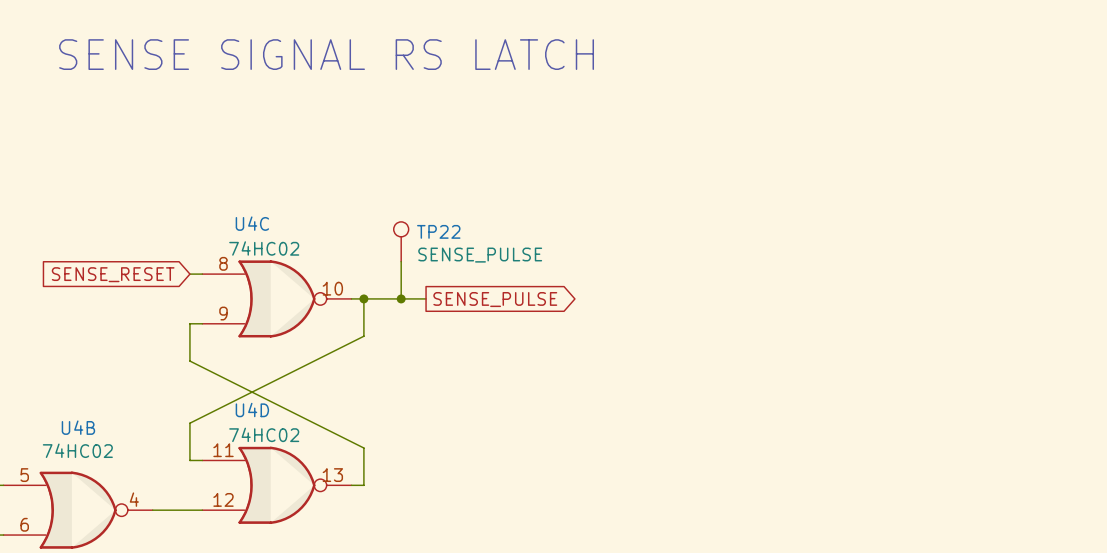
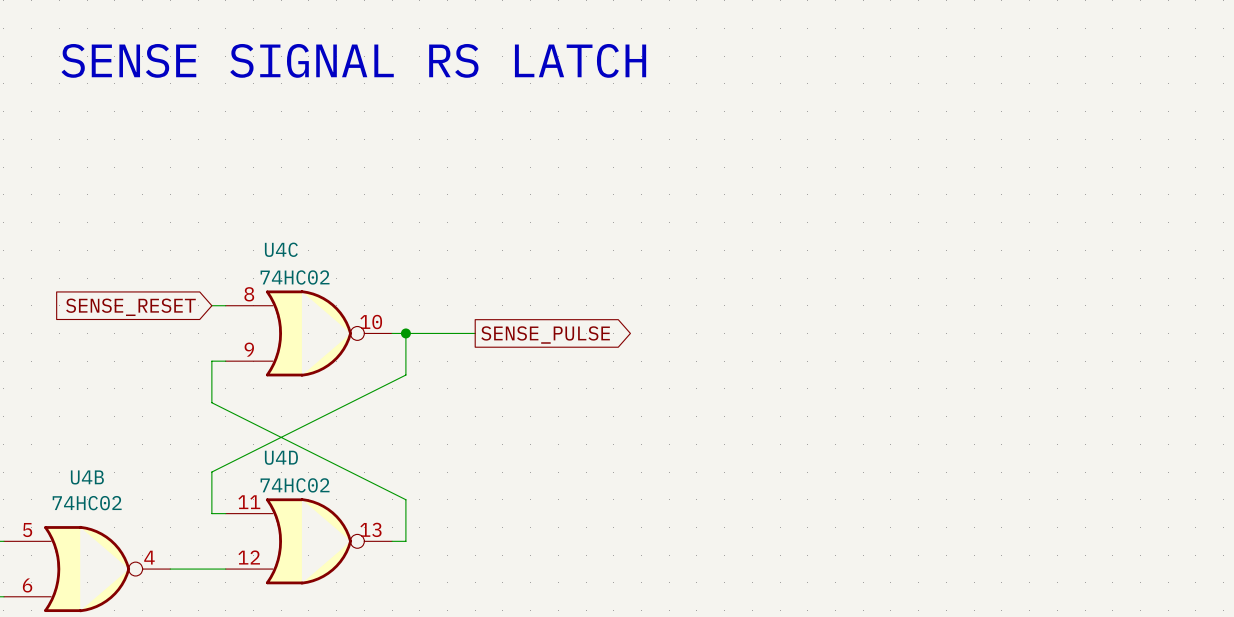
TP22: SENSE_PULSE (401, 241) -> none
wire: (401, 261) (401, 298) -> none
junction: (401, 298) -> none

